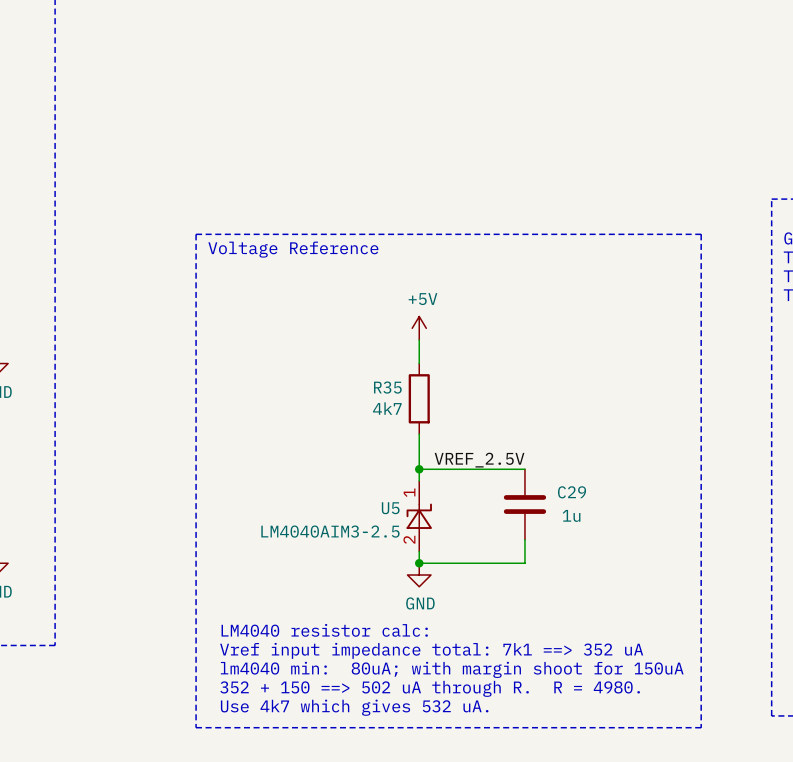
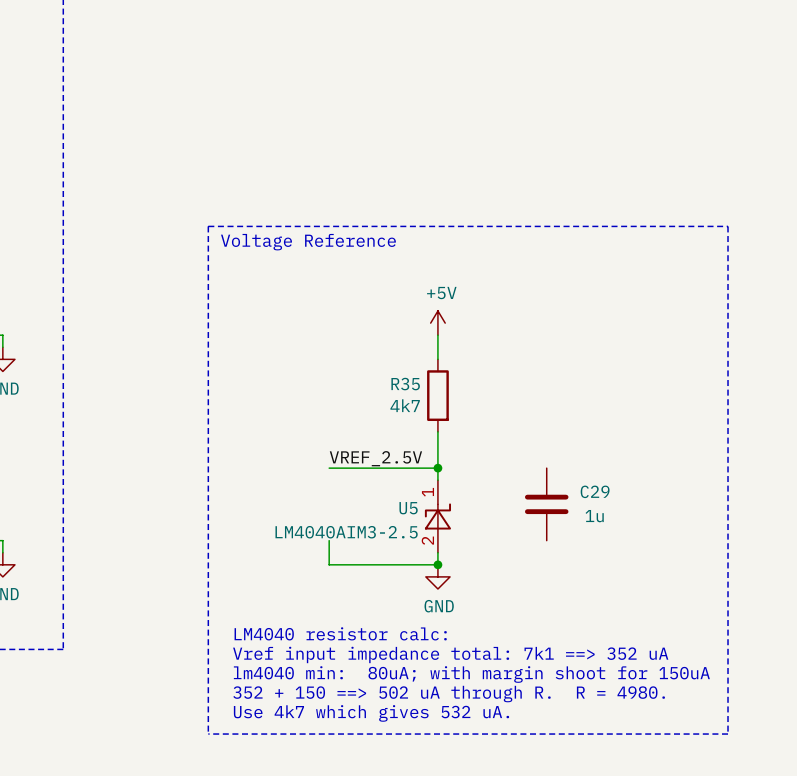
label position: VREF_2.5V (479, 460) -> VREF_2.5V (375, 458)
wire: (419, 469) (524, 469) -> (437, 468) (329, 468)
wire: (524, 539) (524, 563) (419, 563) -> (329, 540) (329, 564) (437, 564)

